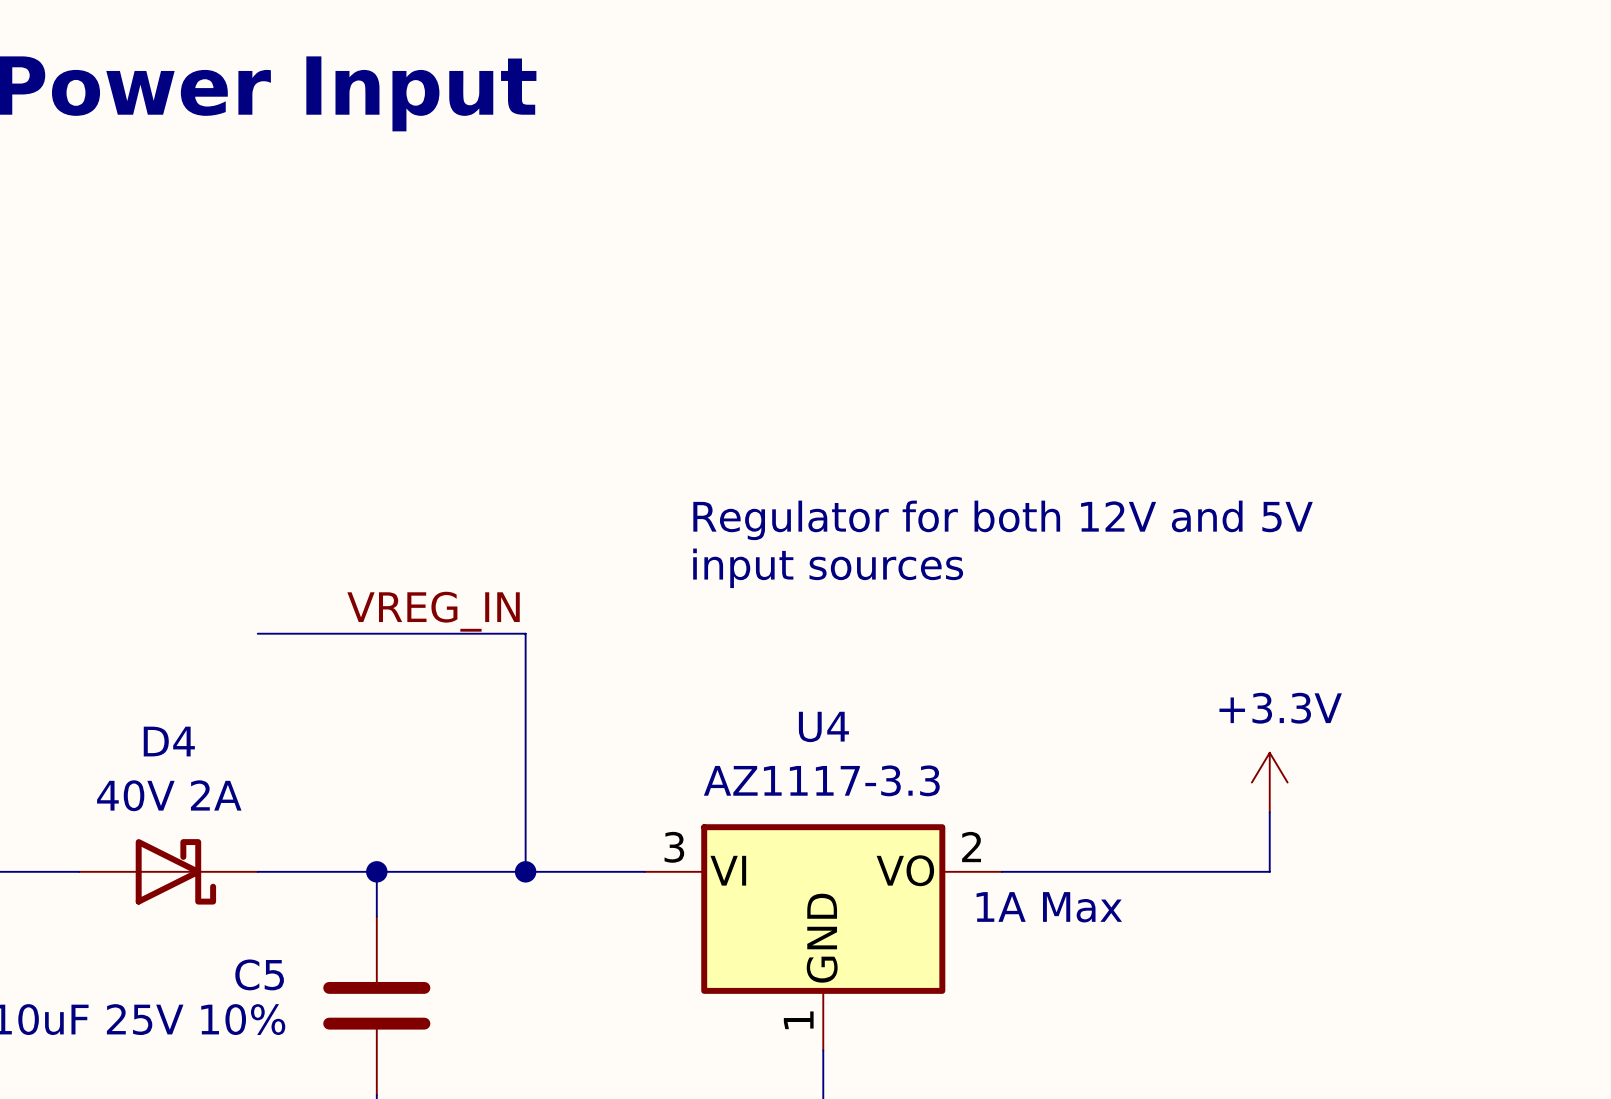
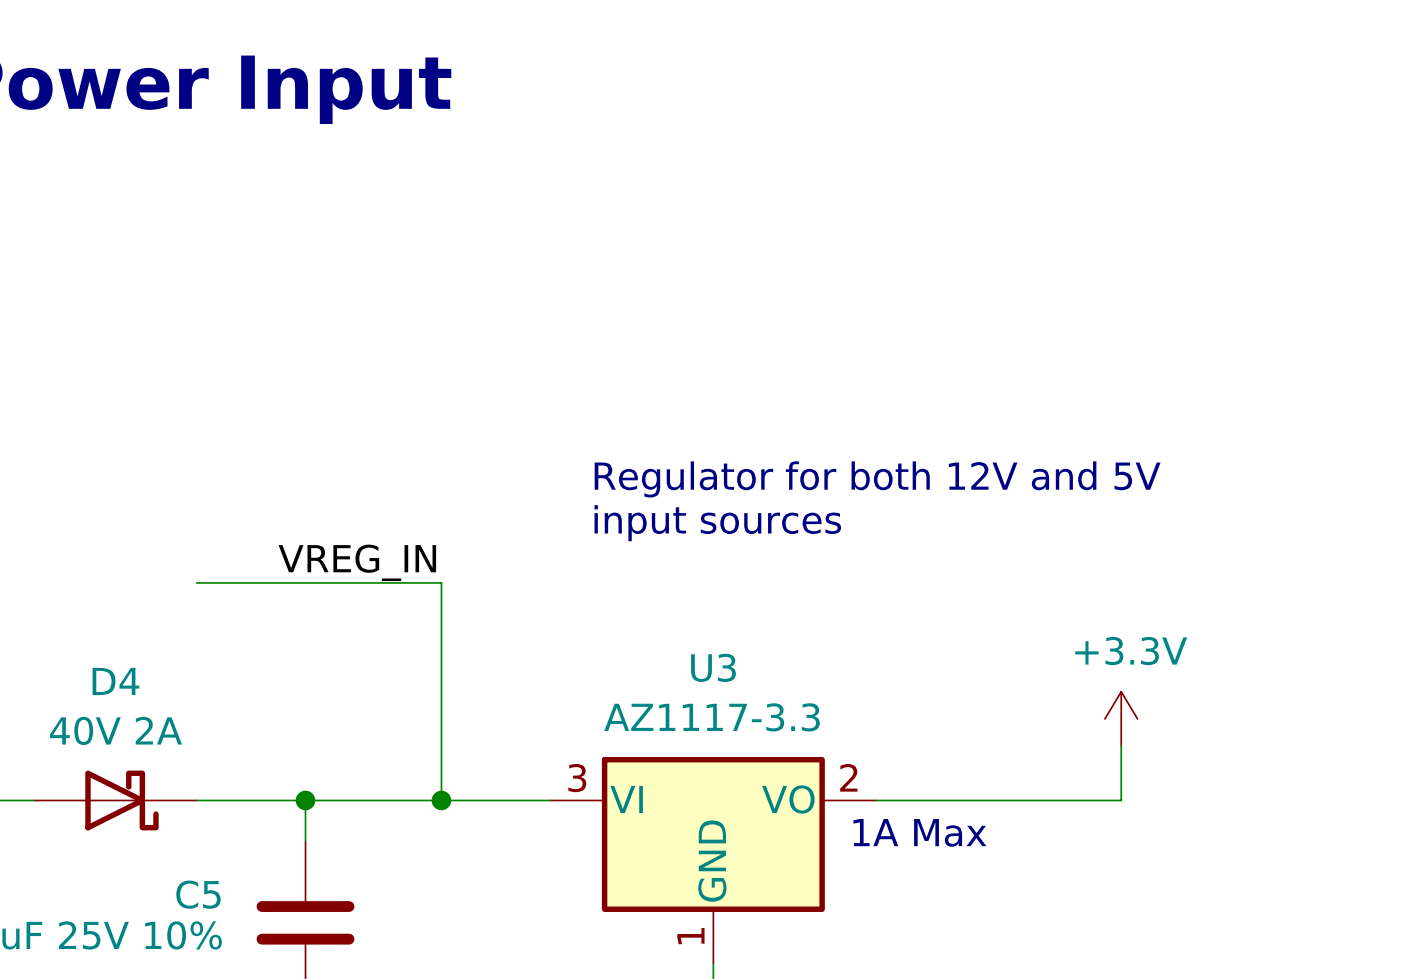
U4 name: U4 (823, 726) -> U3 (713, 667)

